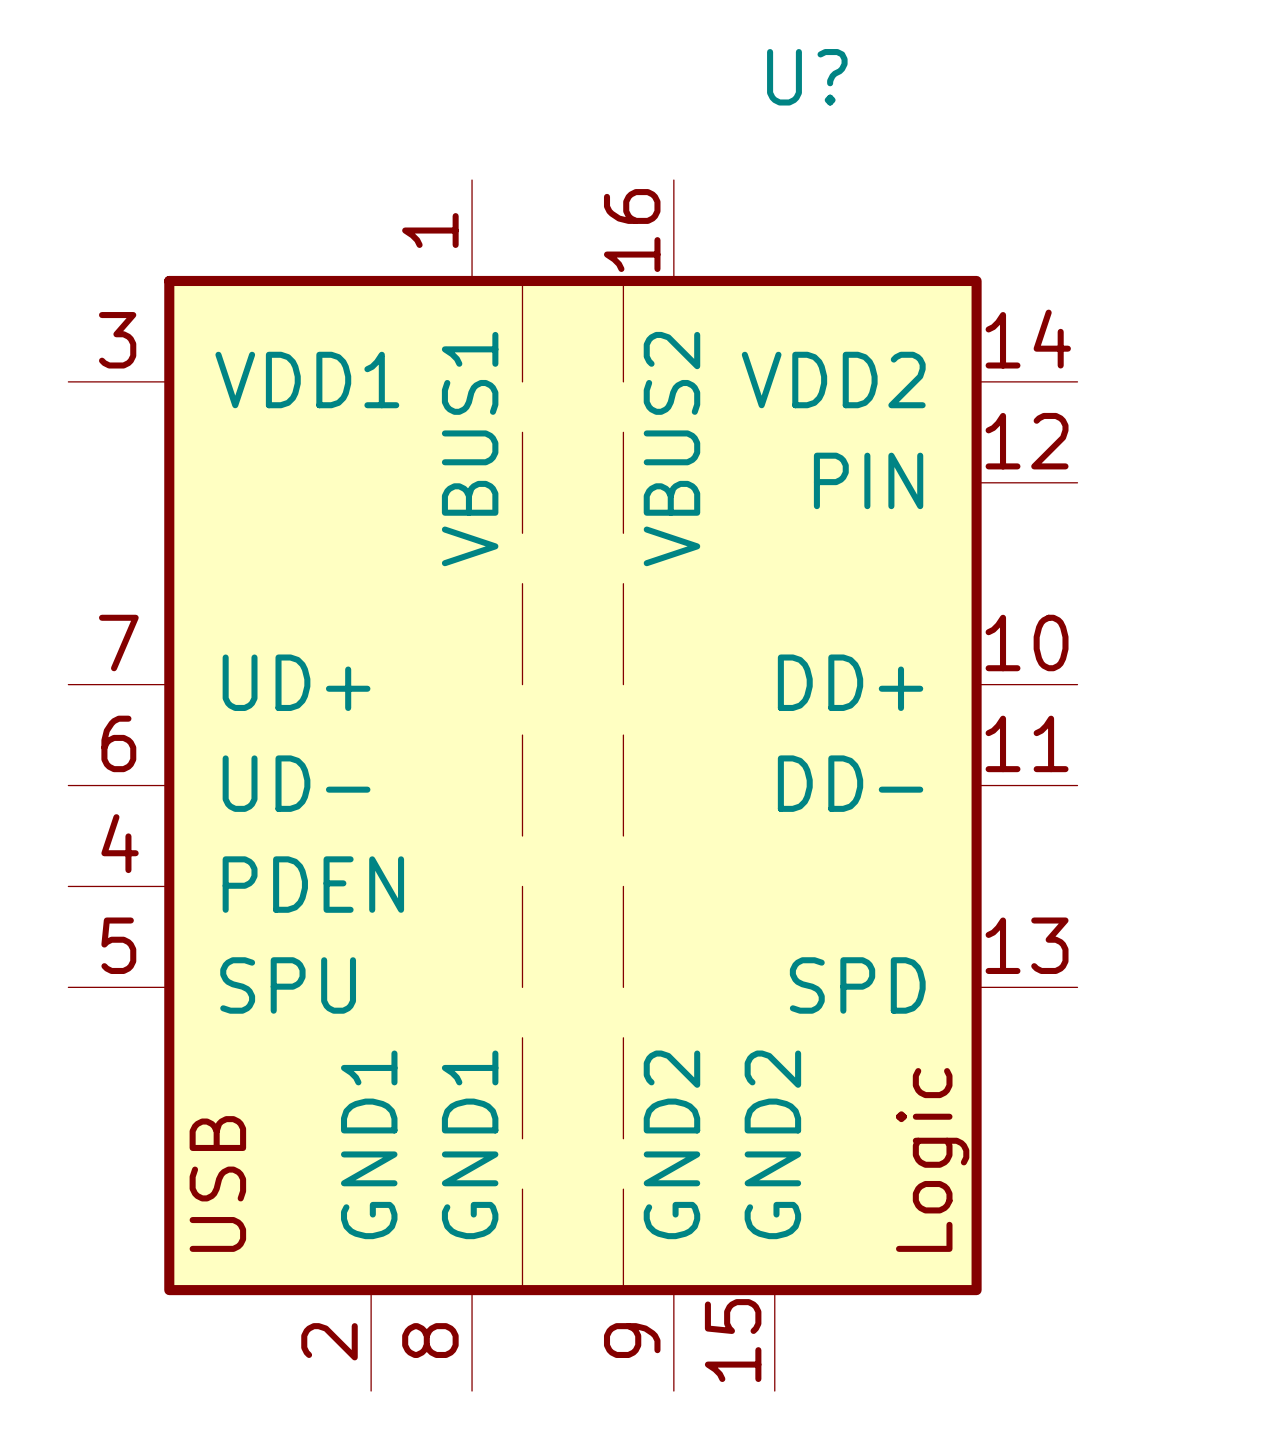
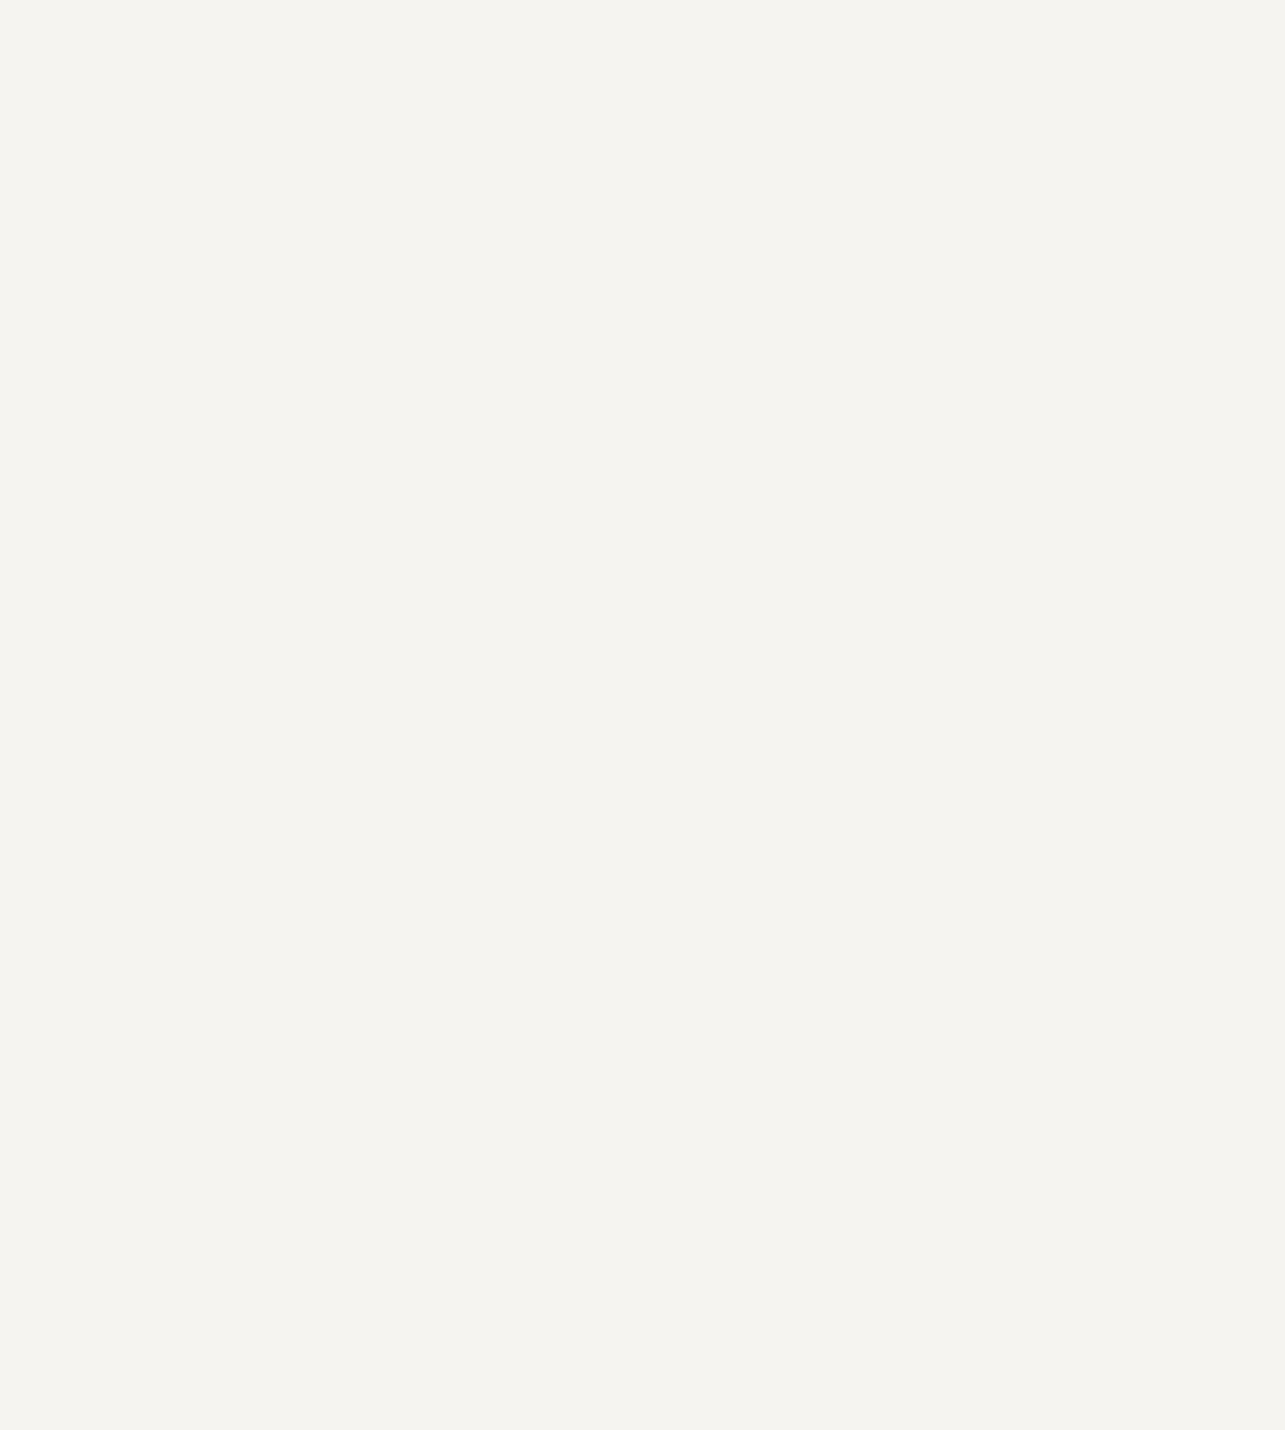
U?: (572, 785) -> none

